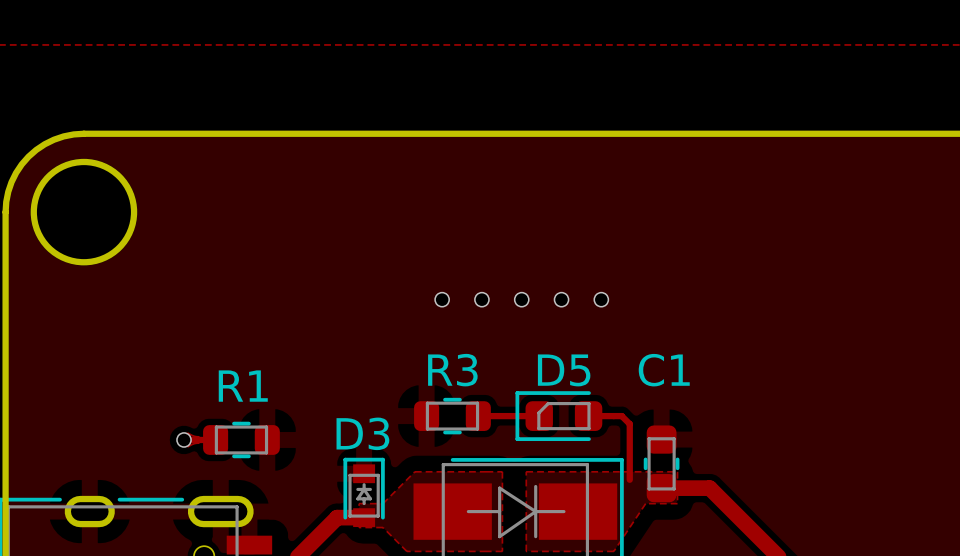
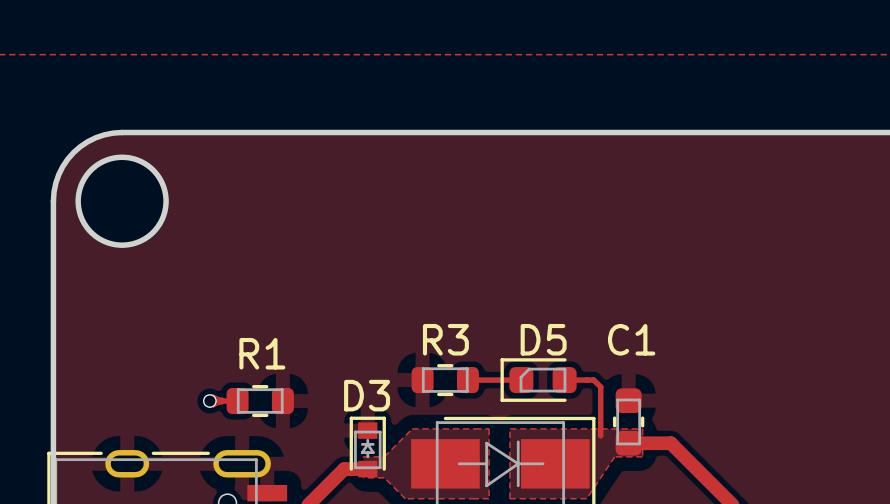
via: (442, 299) -> none
via: (481, 299) -> none
via: (521, 299) -> none
via: (561, 299) -> none
via: (601, 299) -> none

